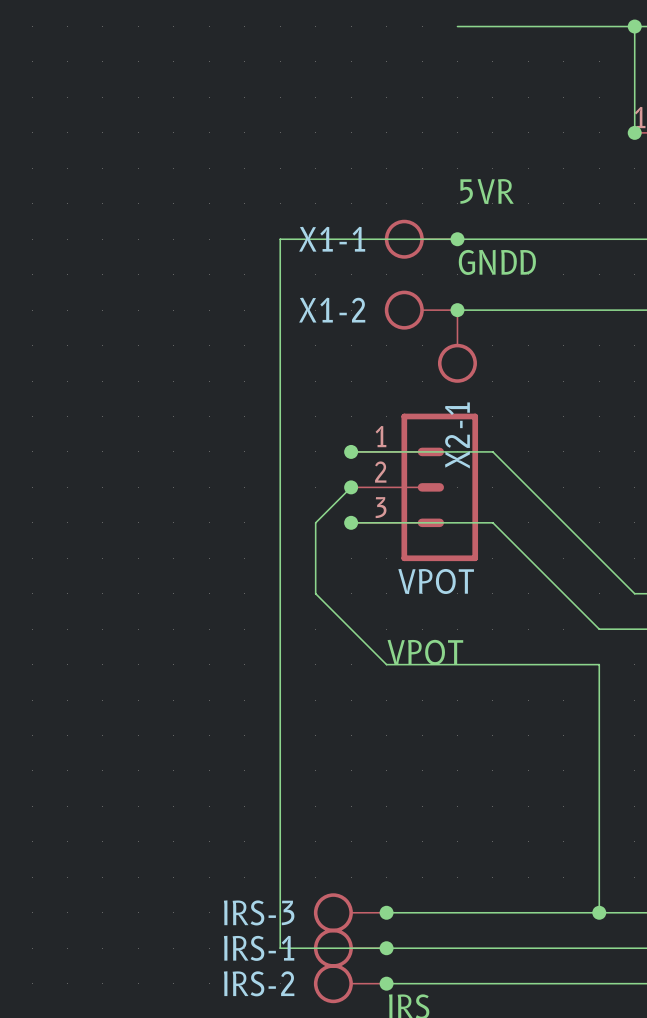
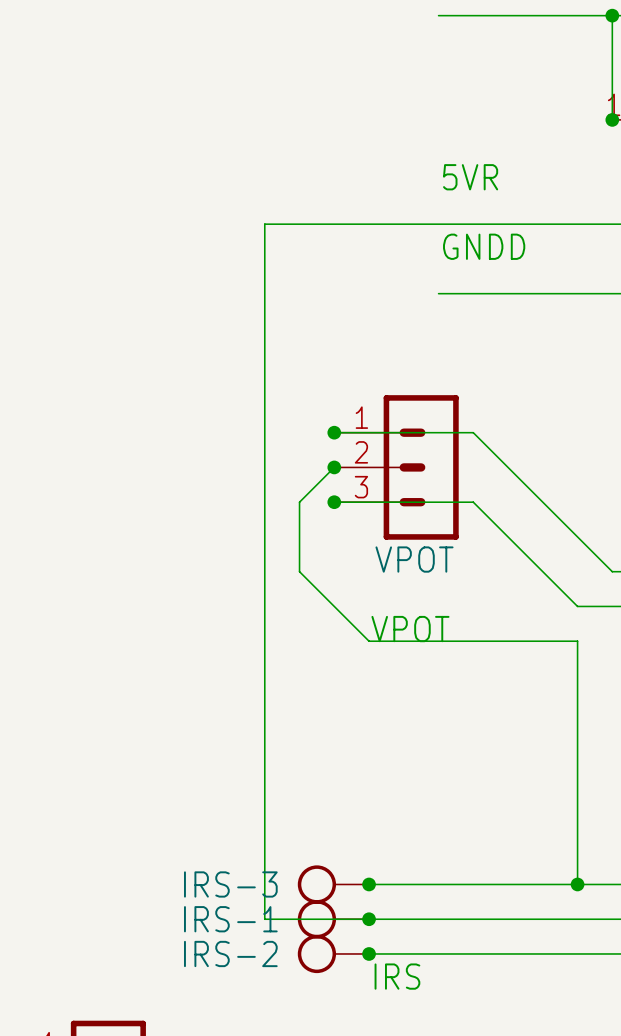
X1-1: (421, 239) -> none
junction: (457, 239) -> none
X1-2: (421, 310) -> none
junction: (457, 310) -> none
X2-1: (457, 346) -> none

